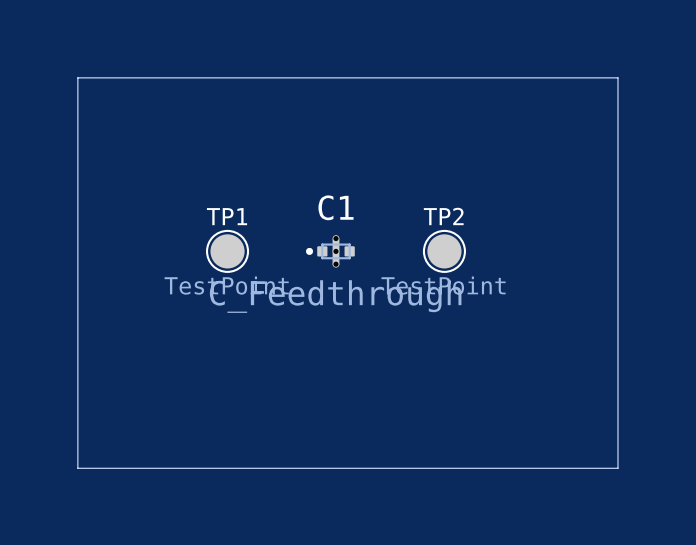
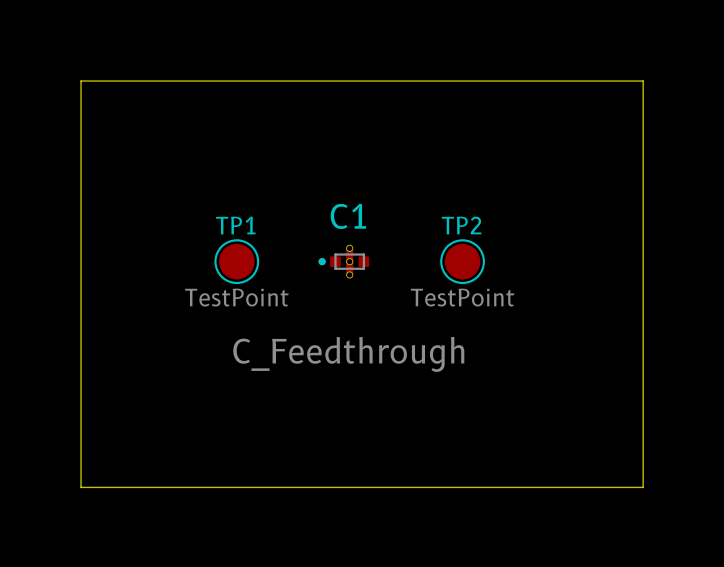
C1 value position: C_Feedthrough (335, 296) -> C_Feedthrough (348, 354)

